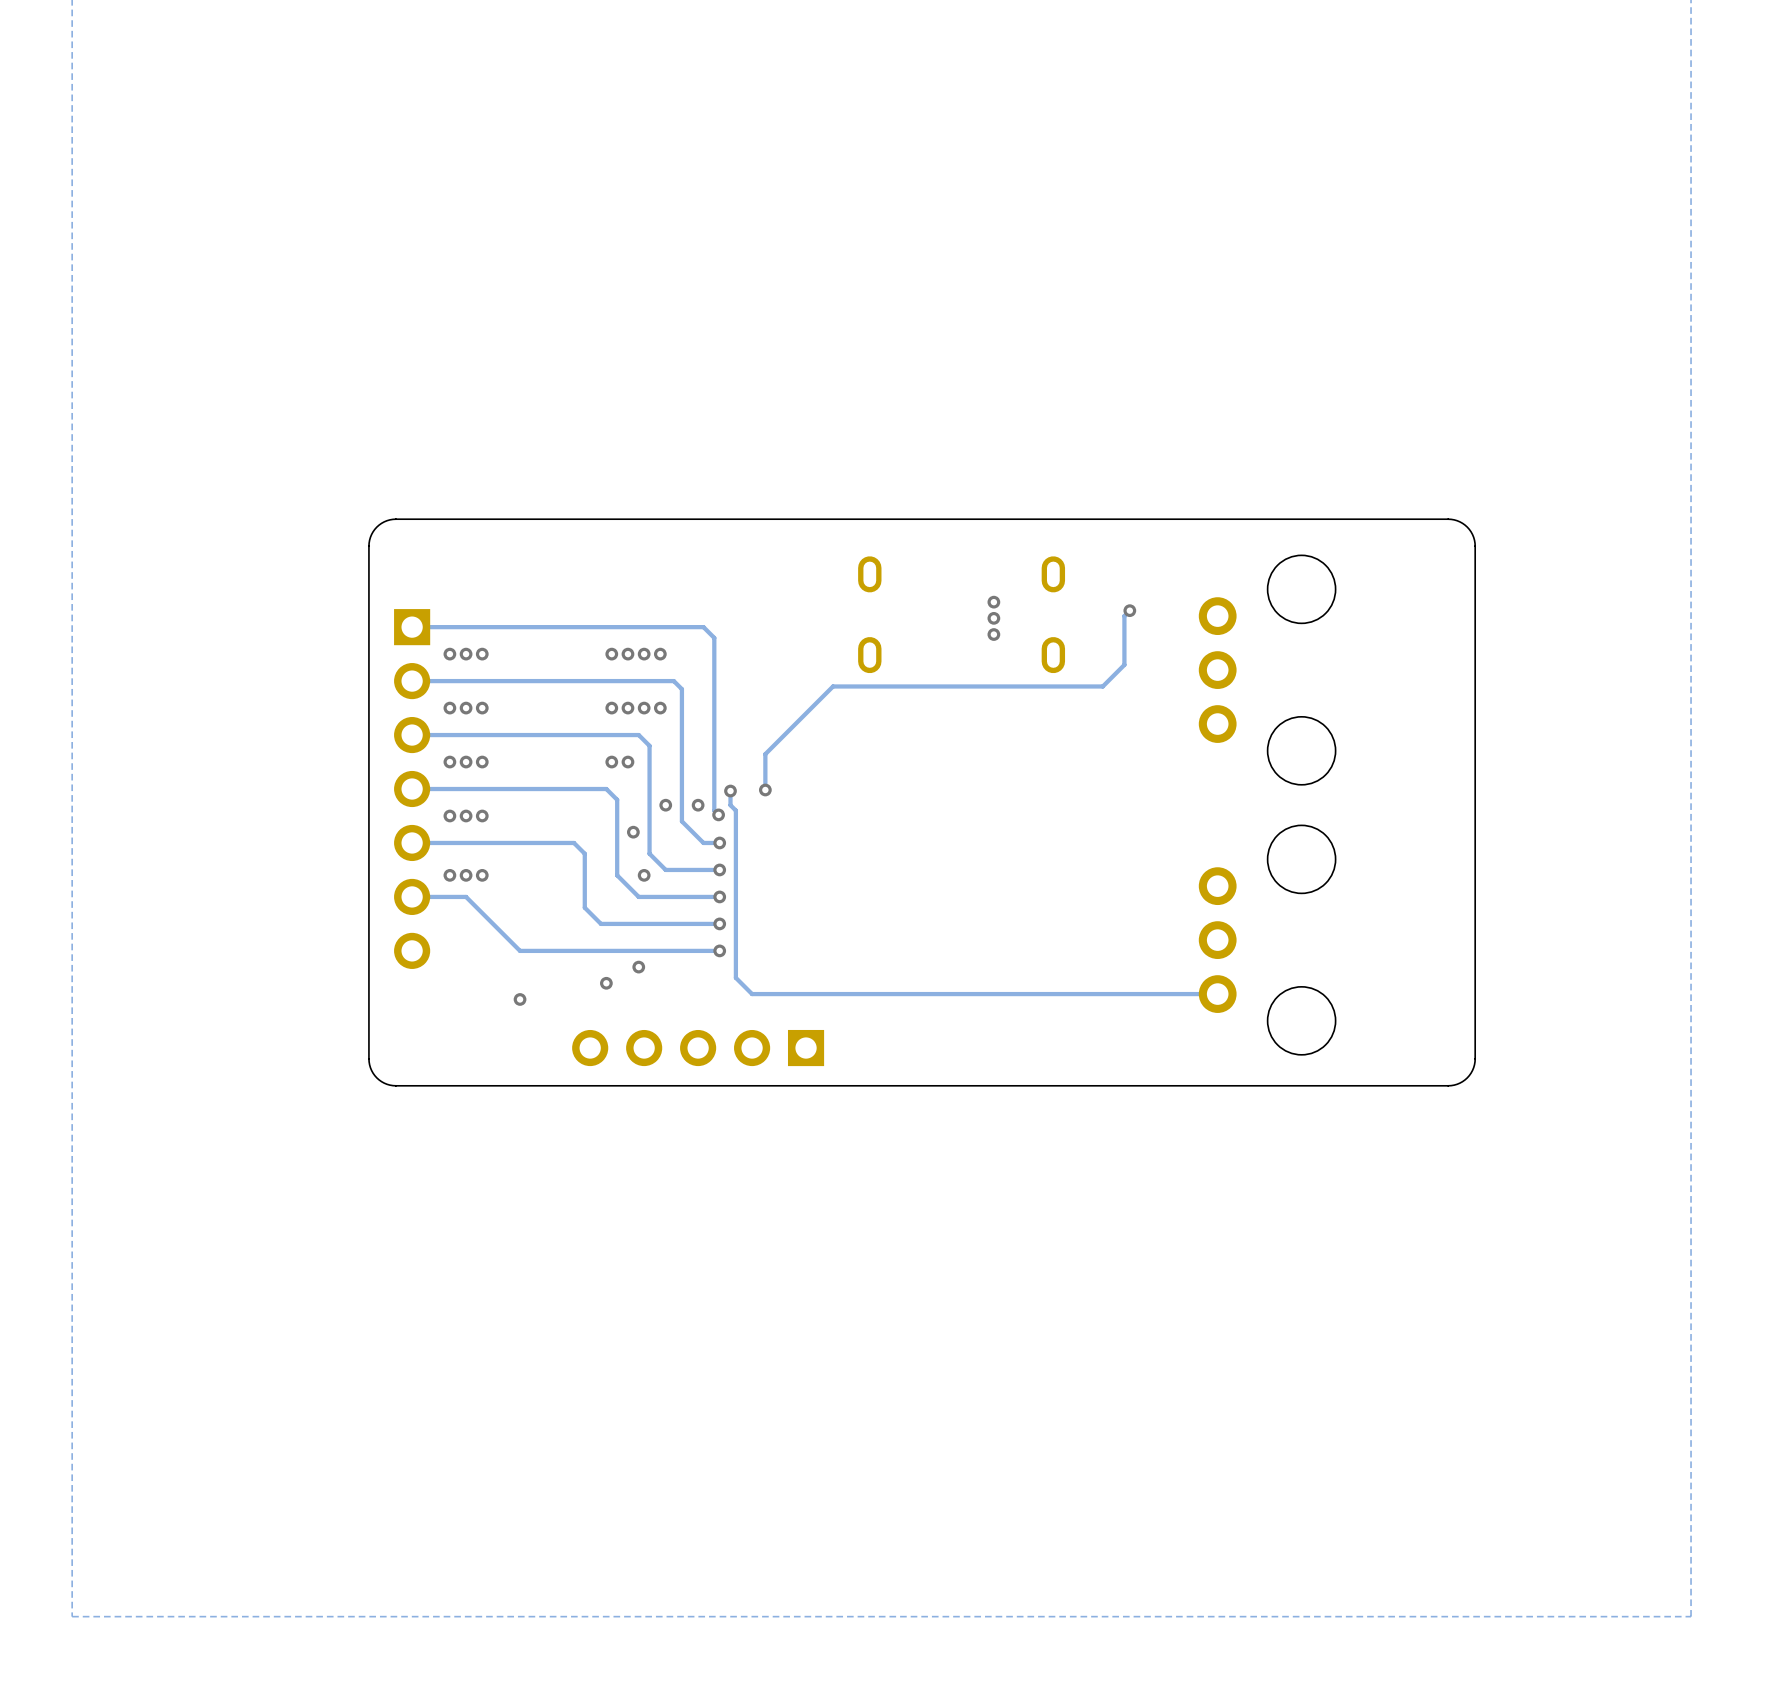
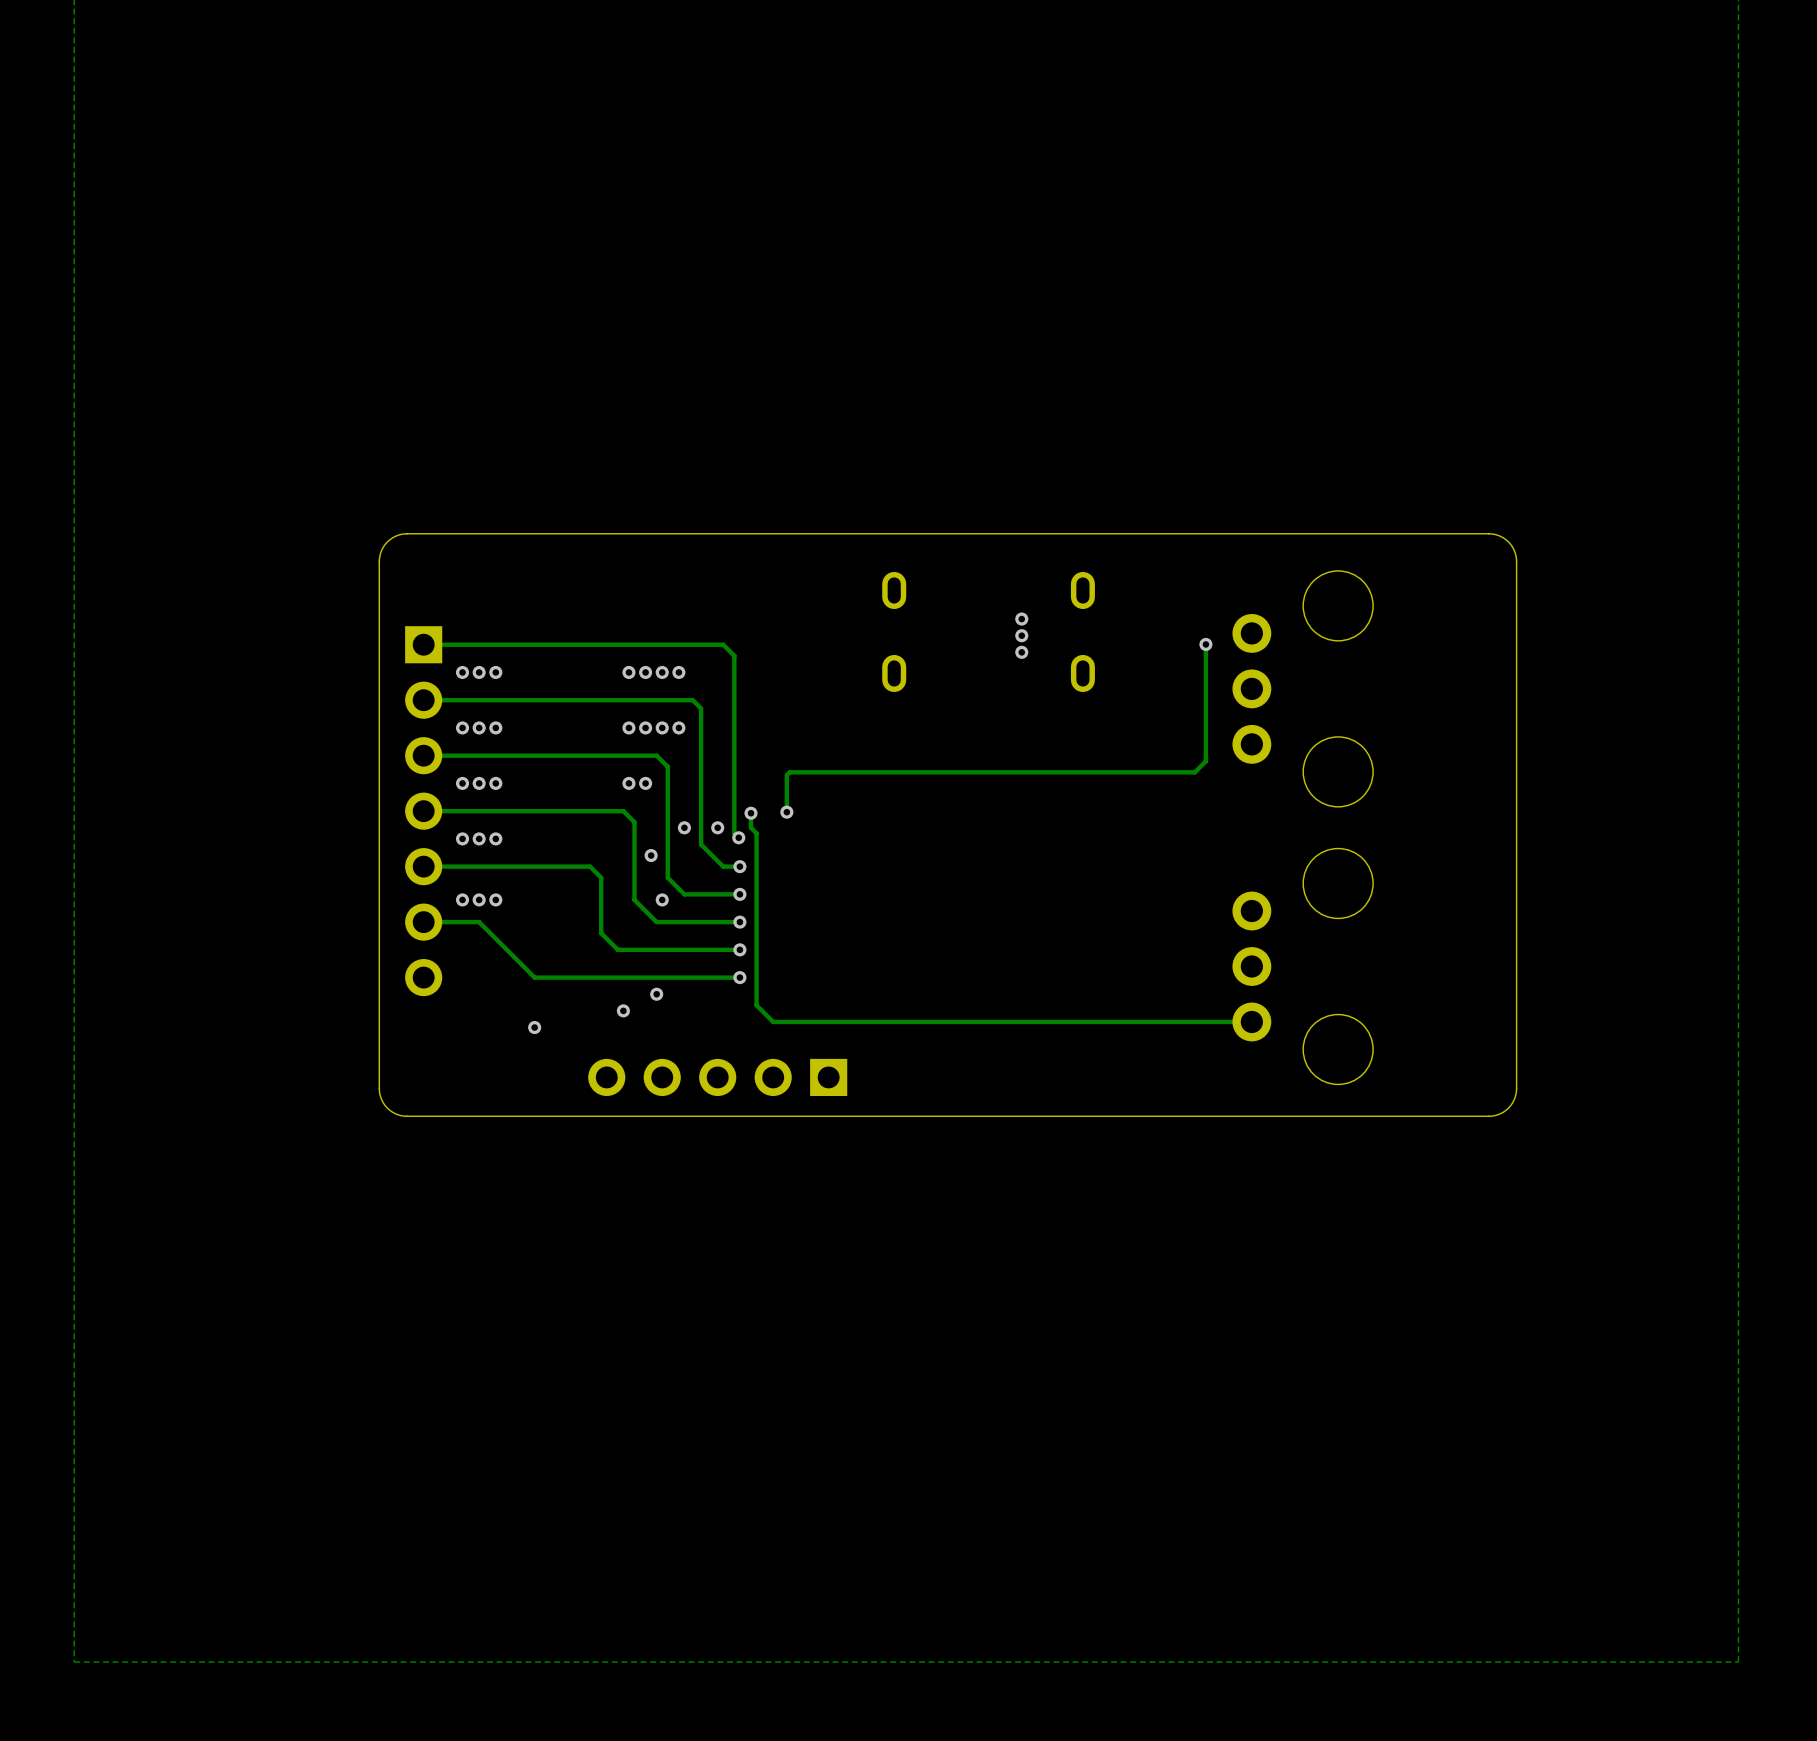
track: (1129, 610) (1124, 616) (1124, 664) (1102, 686) (833, 686) (768, 751) -> (1205, 644) (1205, 761) (1194, 772) (789, 772)
via position: (1129, 610) -> (1205, 644)

